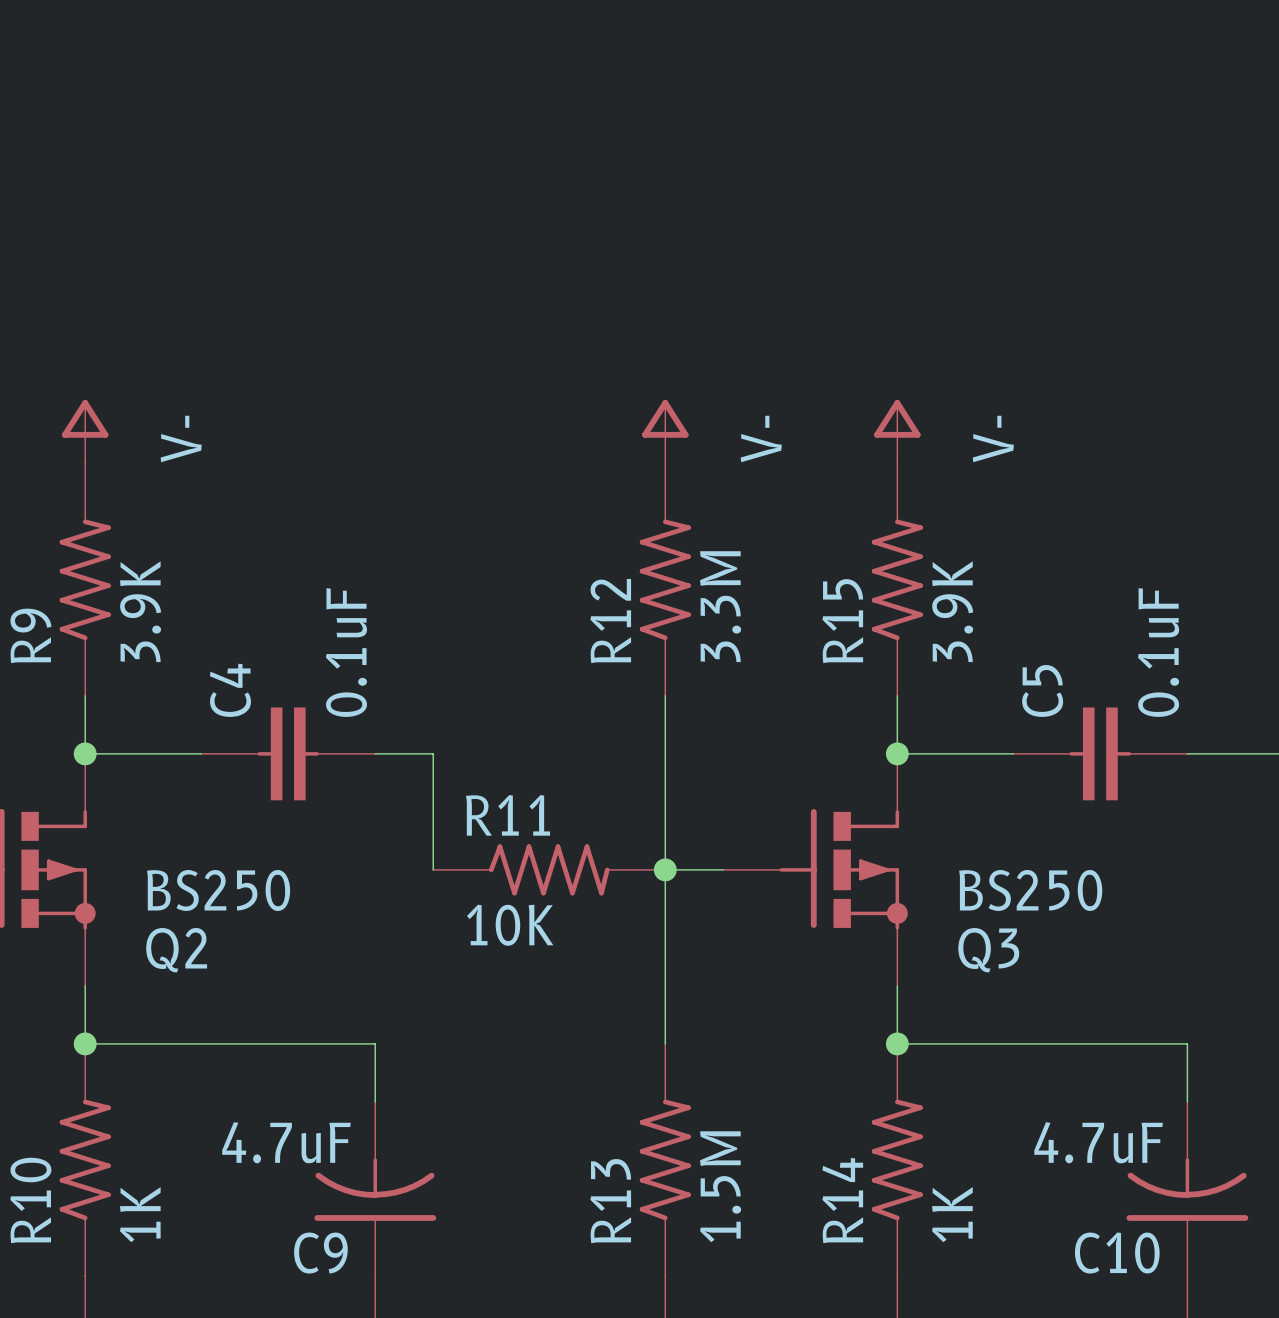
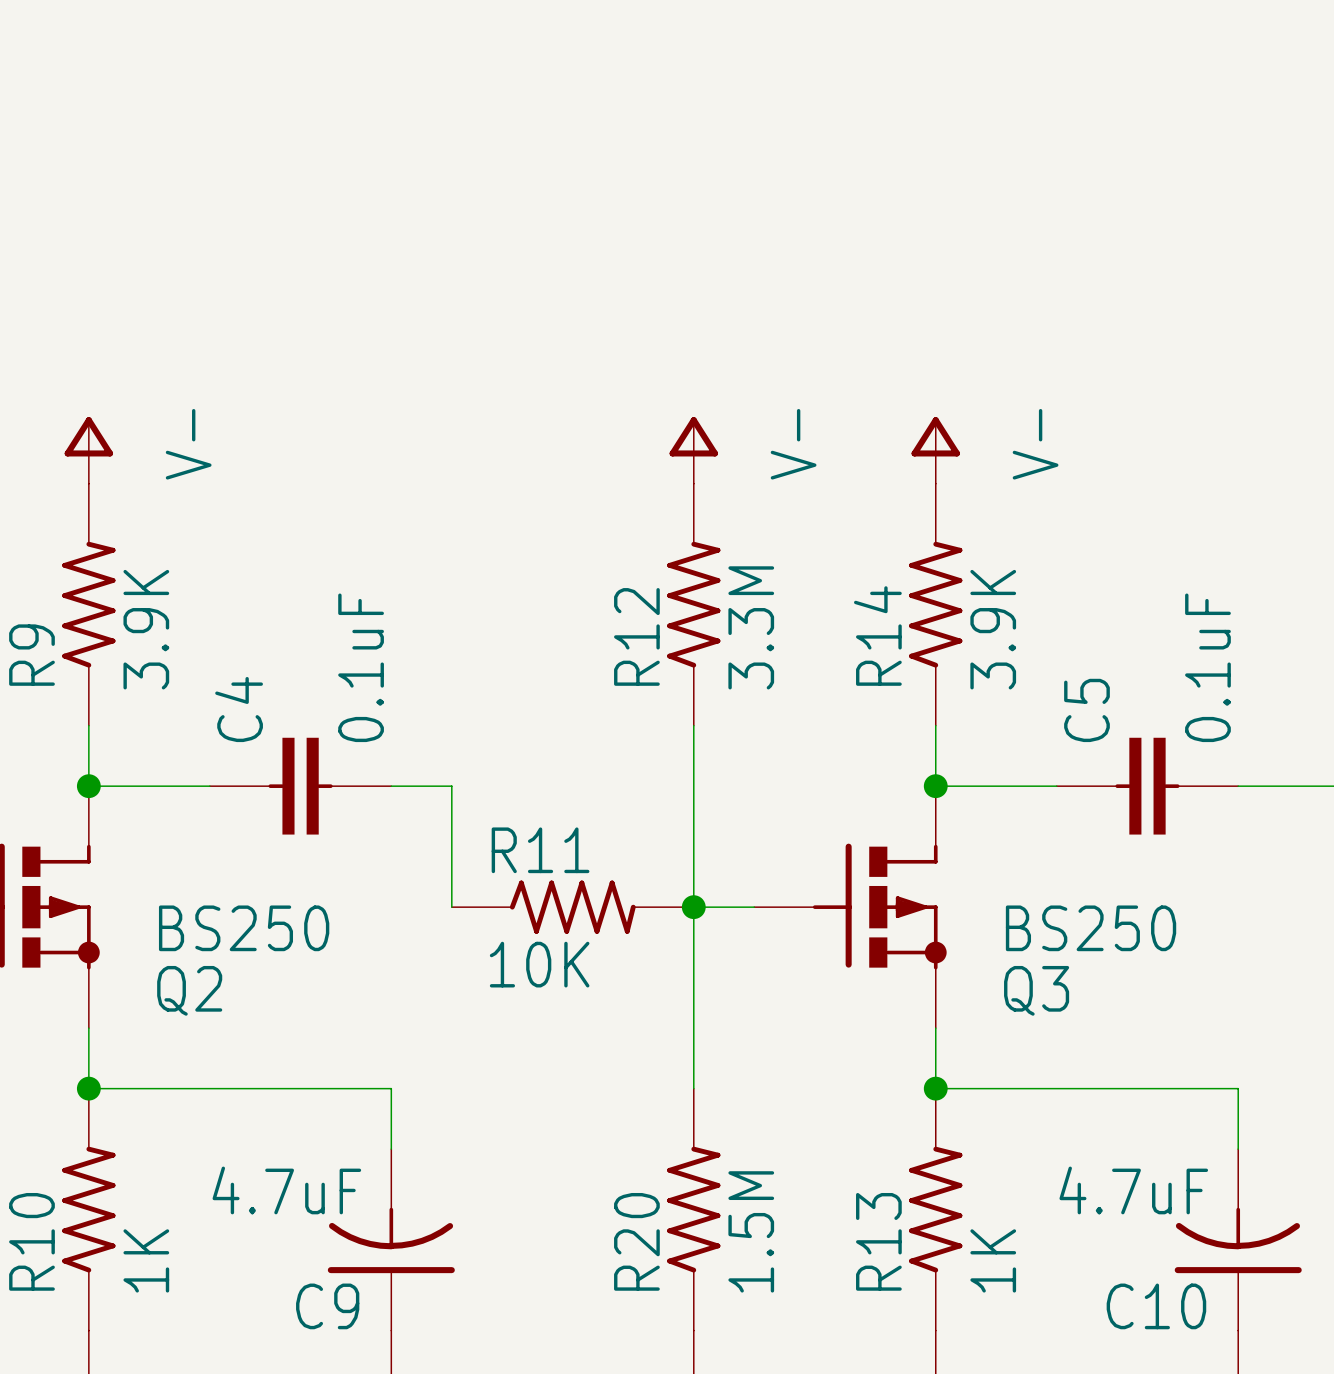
R15 name: R15 (842, 621) -> R14 (877, 636)
R14 name: R14 (842, 1200) -> R13 (878, 1241)
R13 name: R13 (610, 1201) -> R20 (636, 1241)

